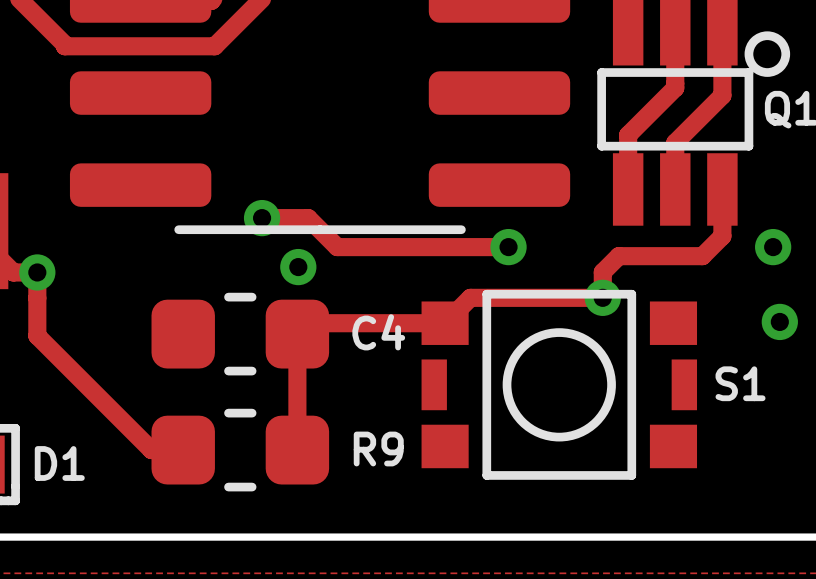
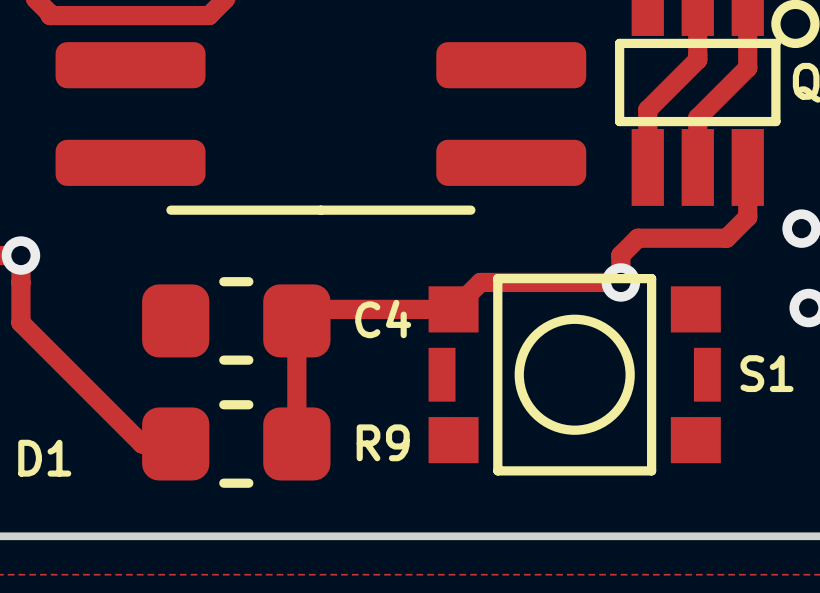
track: (262, 218) (308, 218) (337, 247) (508, 247) -> none
via: (262, 218) -> none
via: (508, 247) -> none
via: (298, 267) -> none

